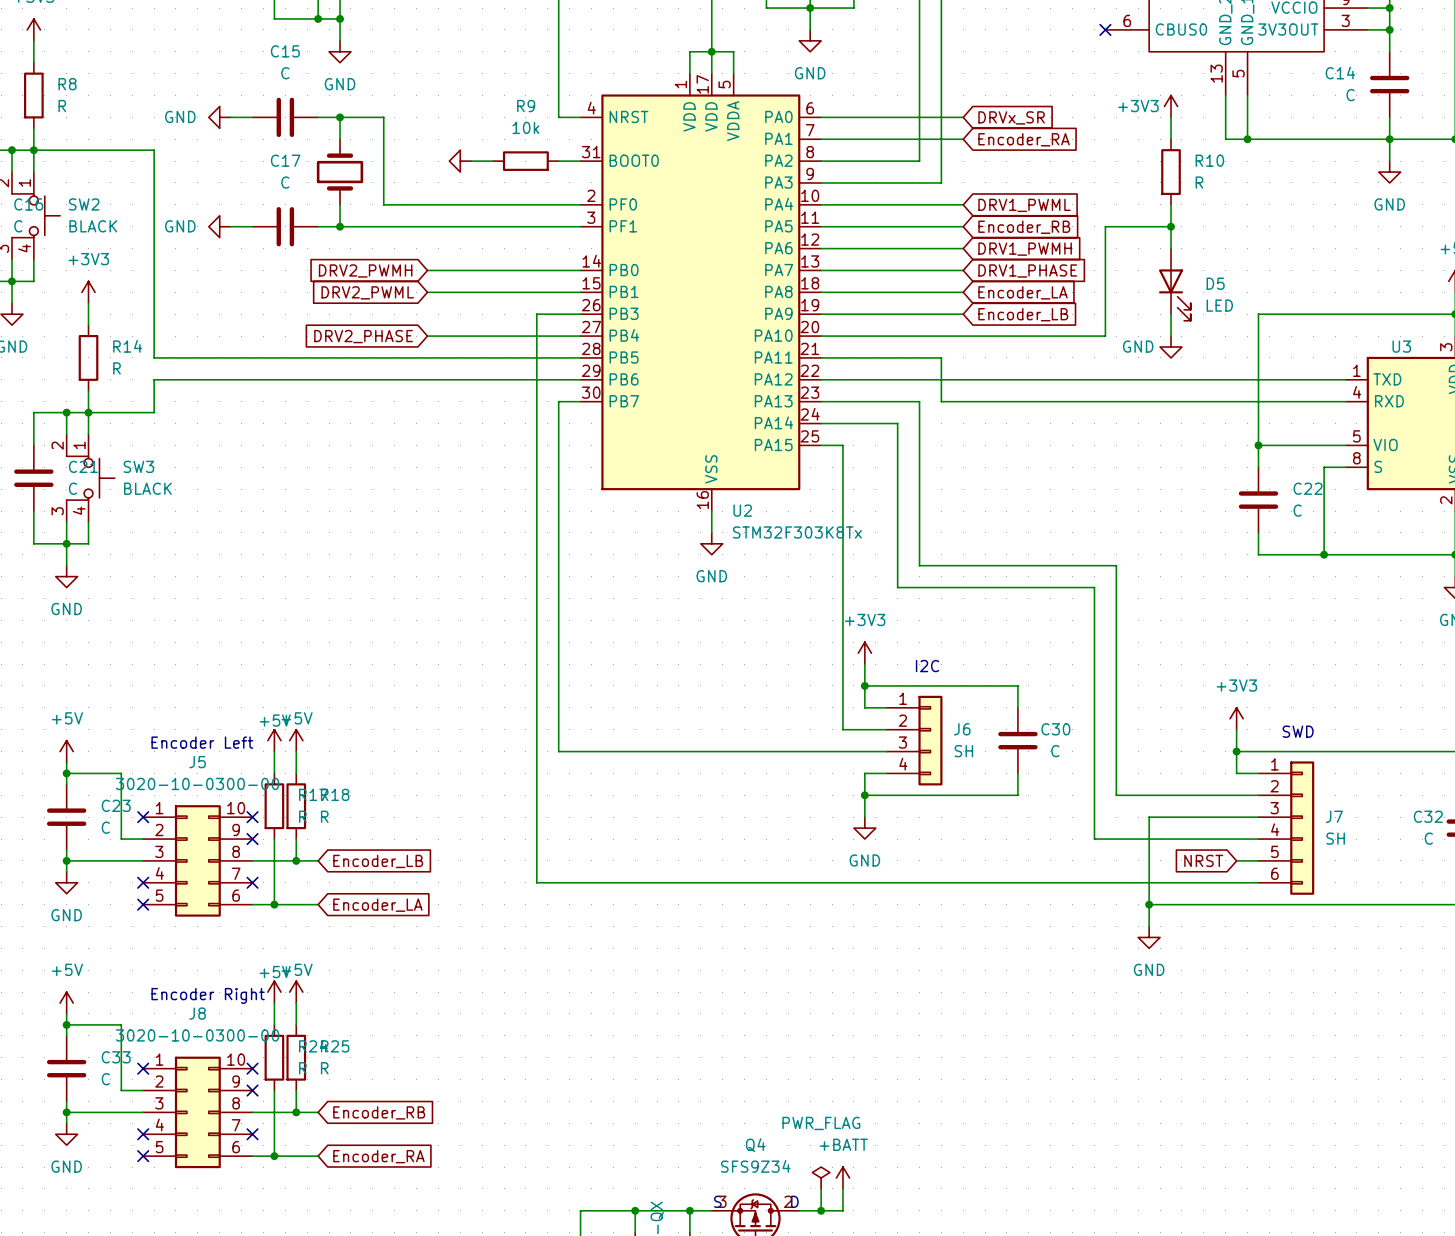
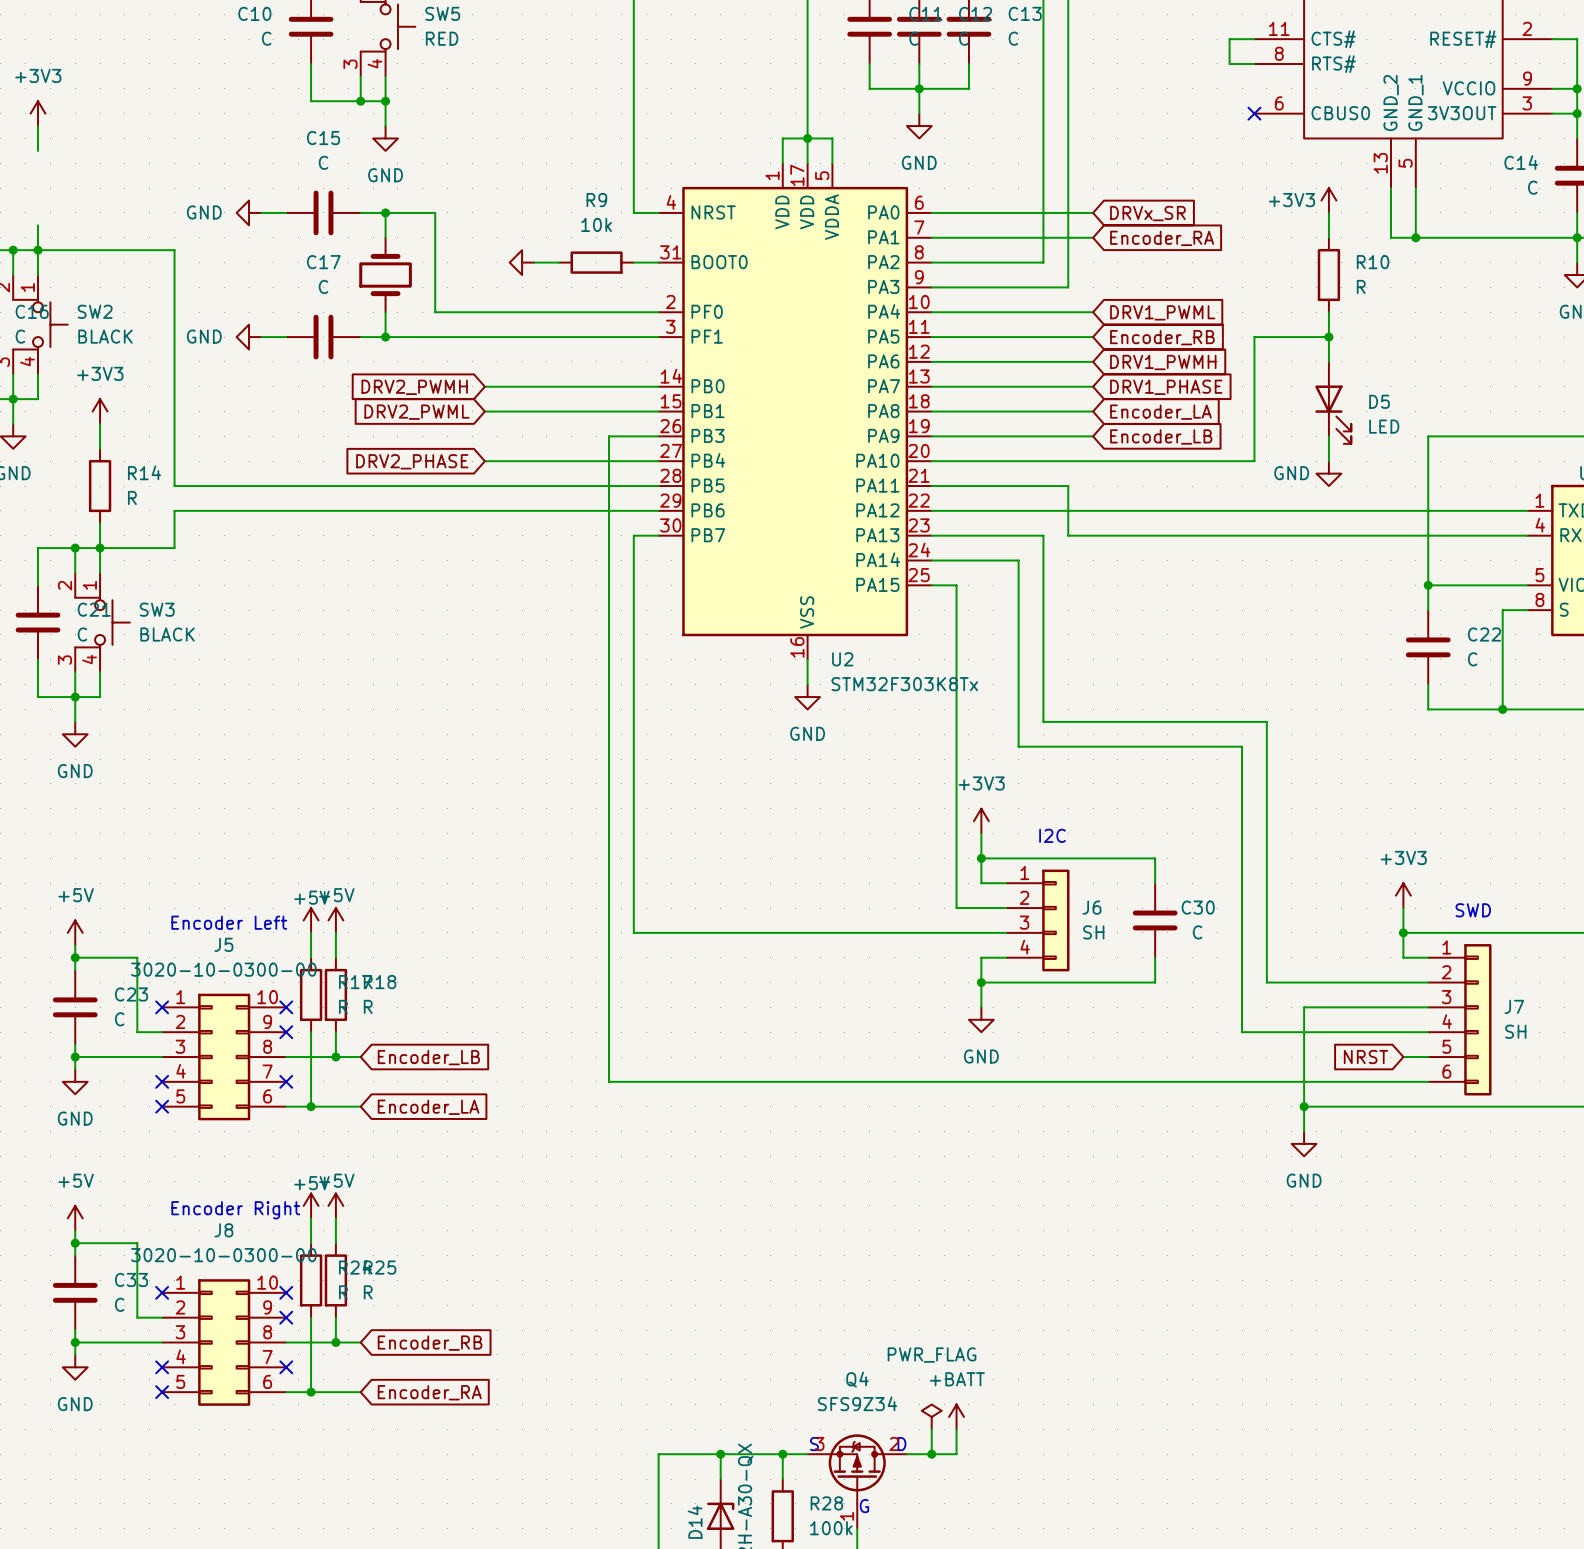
R8: R (33, 95) -> none

